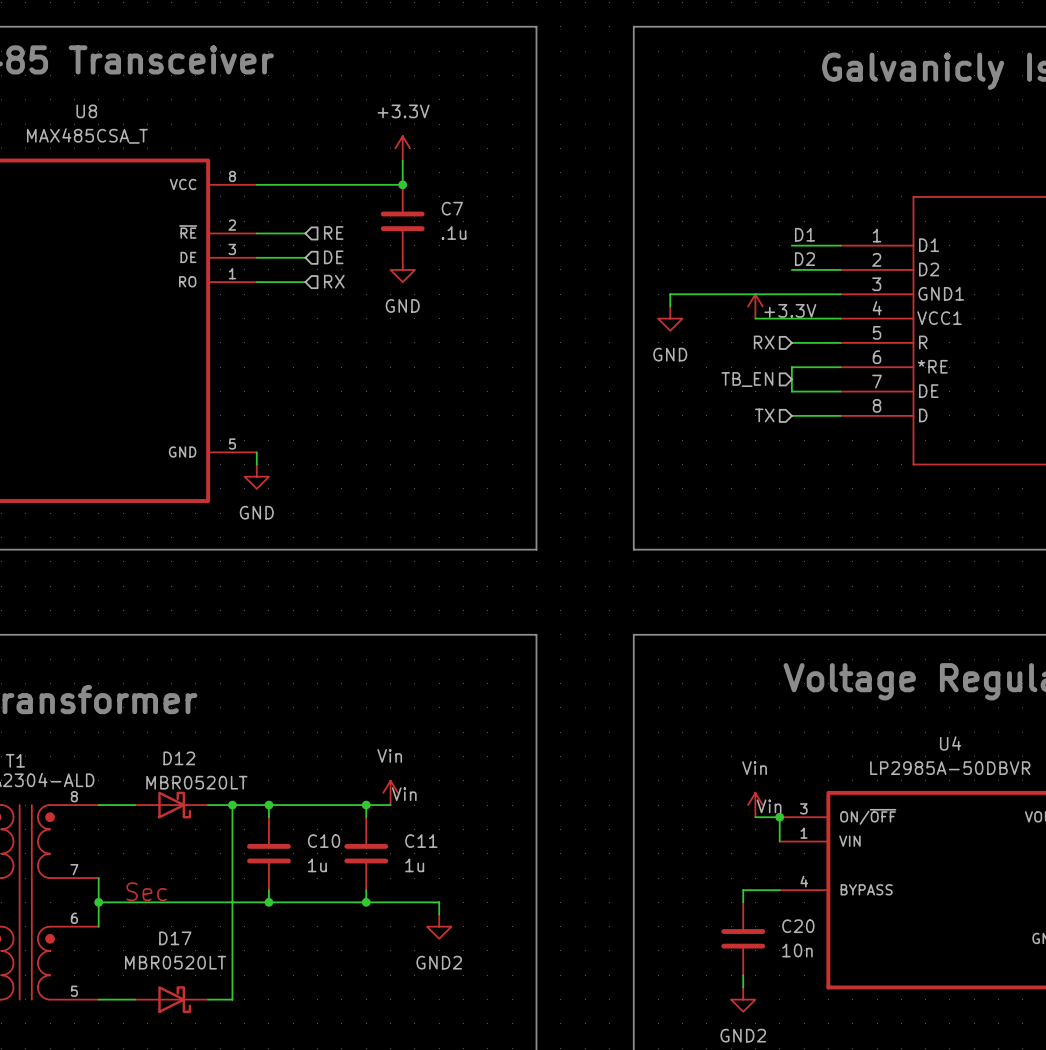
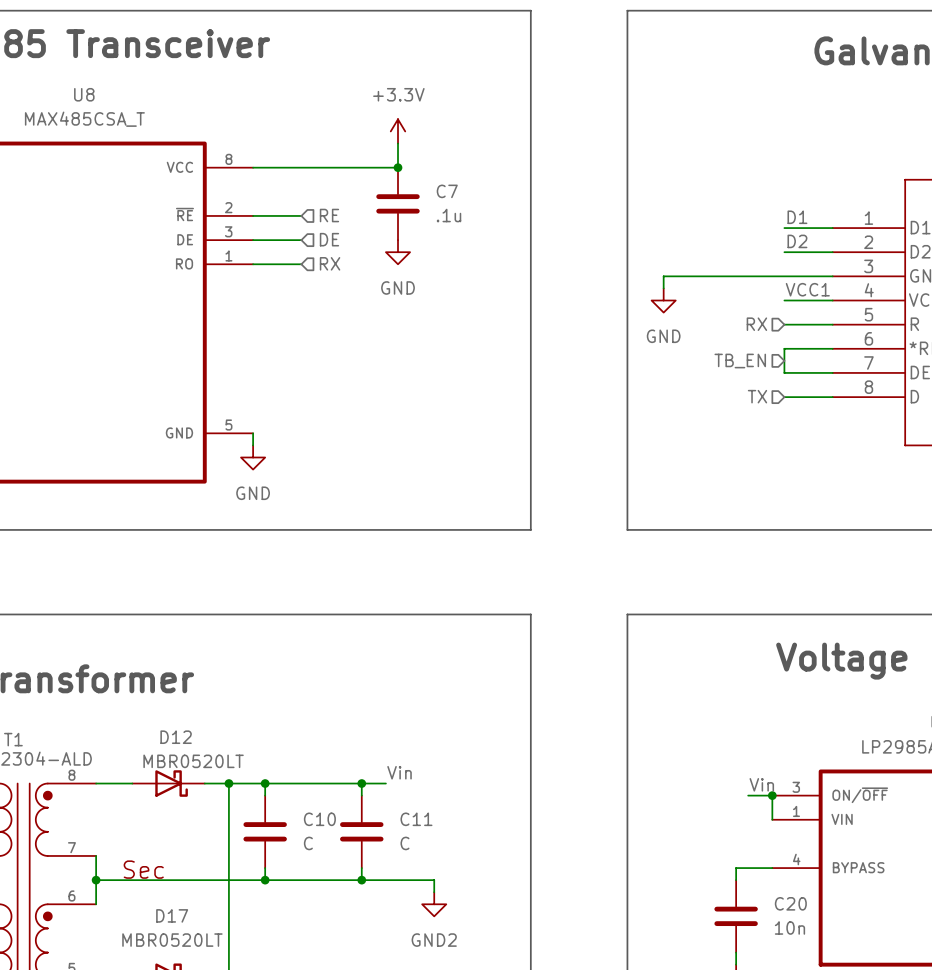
power symbol: +3.3V (755, 306) -> none
label: none -> VCC1 (807, 289)
wire: (755, 318) (791, 318) -> none
power symbol: Vin (390, 792) -> none
power symbol: Vin (755, 805) -> none
C10 value: 1u (317, 865) -> C (308, 843)
C11 value: 1u (414, 865) -> C (404, 843)

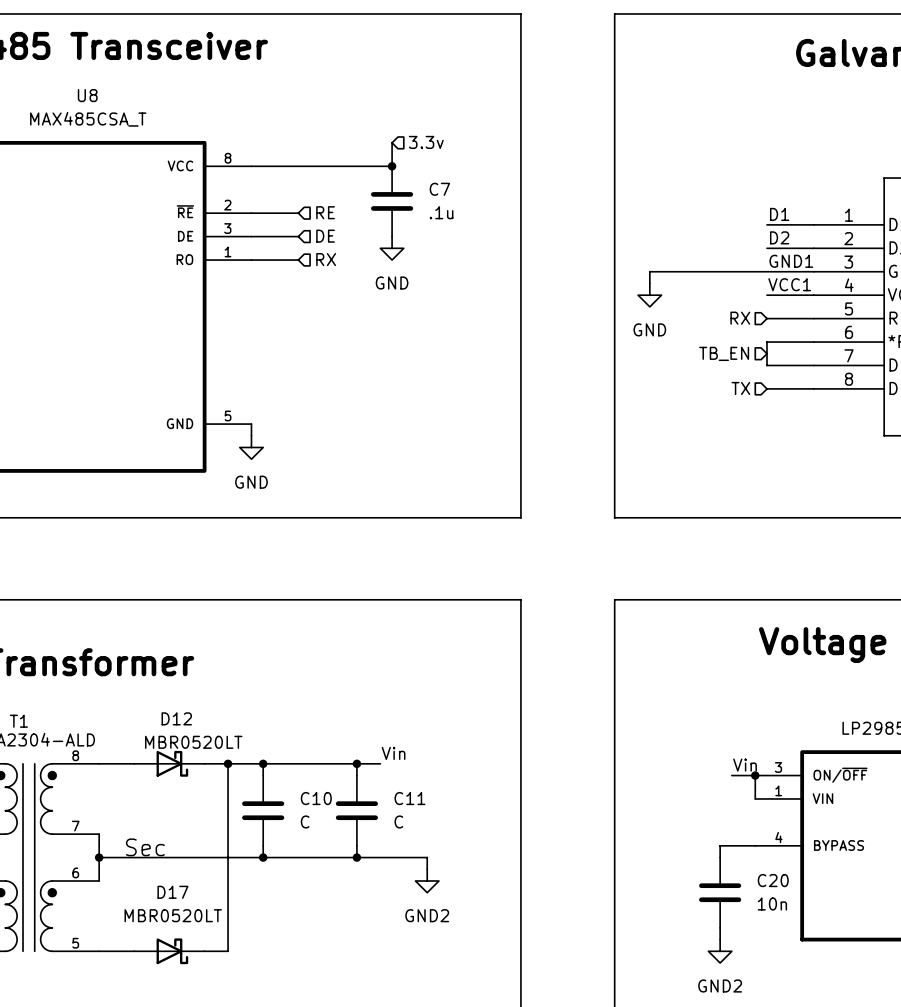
power symbol: +3.3V (398, 131) -> none
hierarchical label: none -> 3.3v (426, 142)
label: none -> GND1 (791, 261)

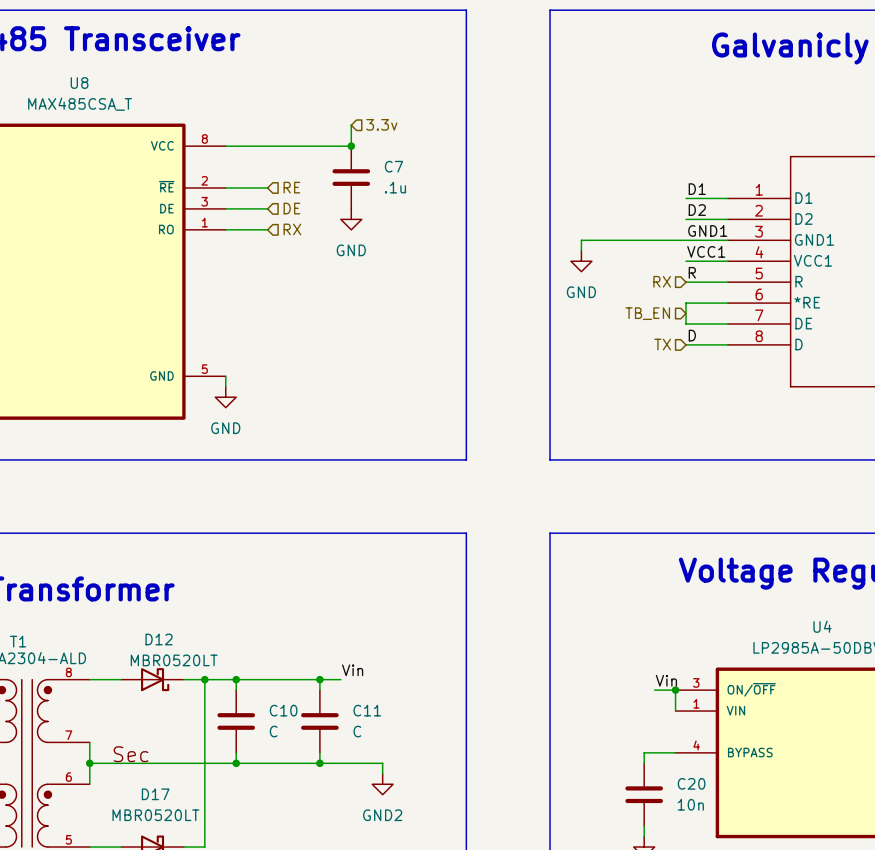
label: none -> R (692, 272)
label: none -> D (692, 335)

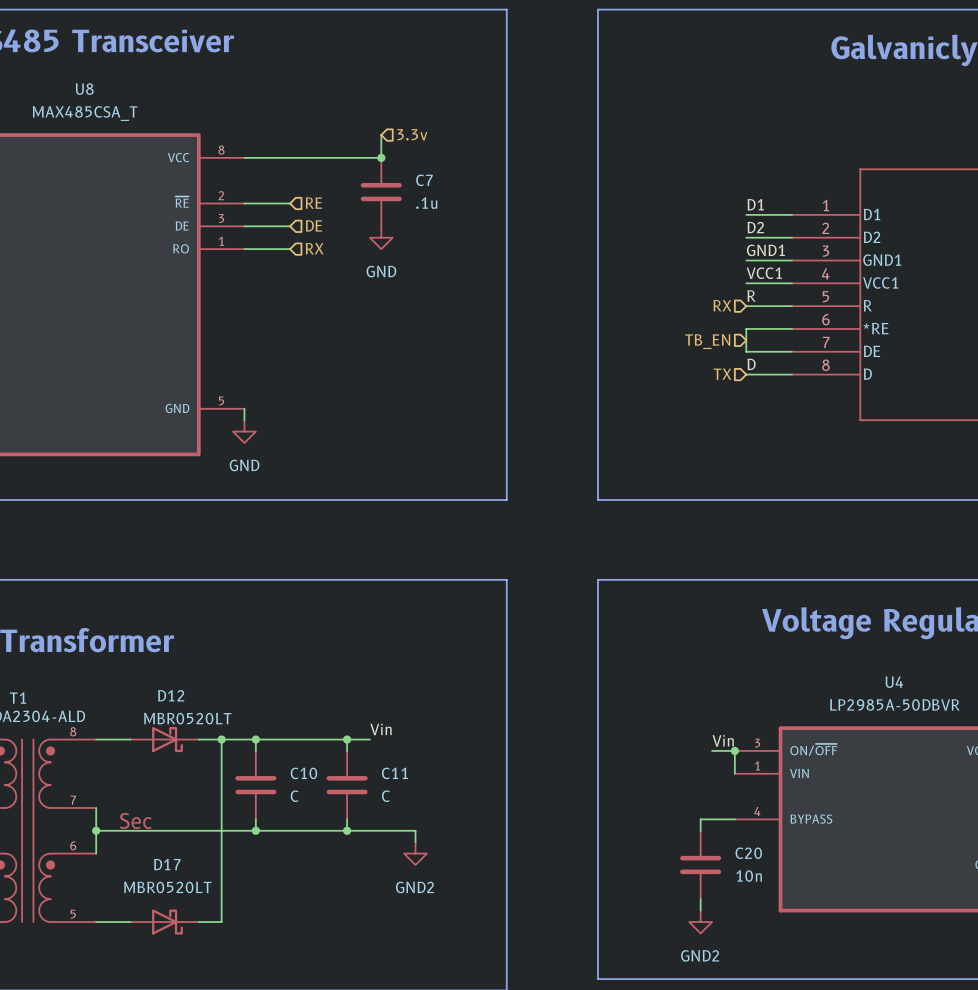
wire: (686, 240) (581, 240) (581, 250) -> none
power symbol: GND (581, 261) -> none

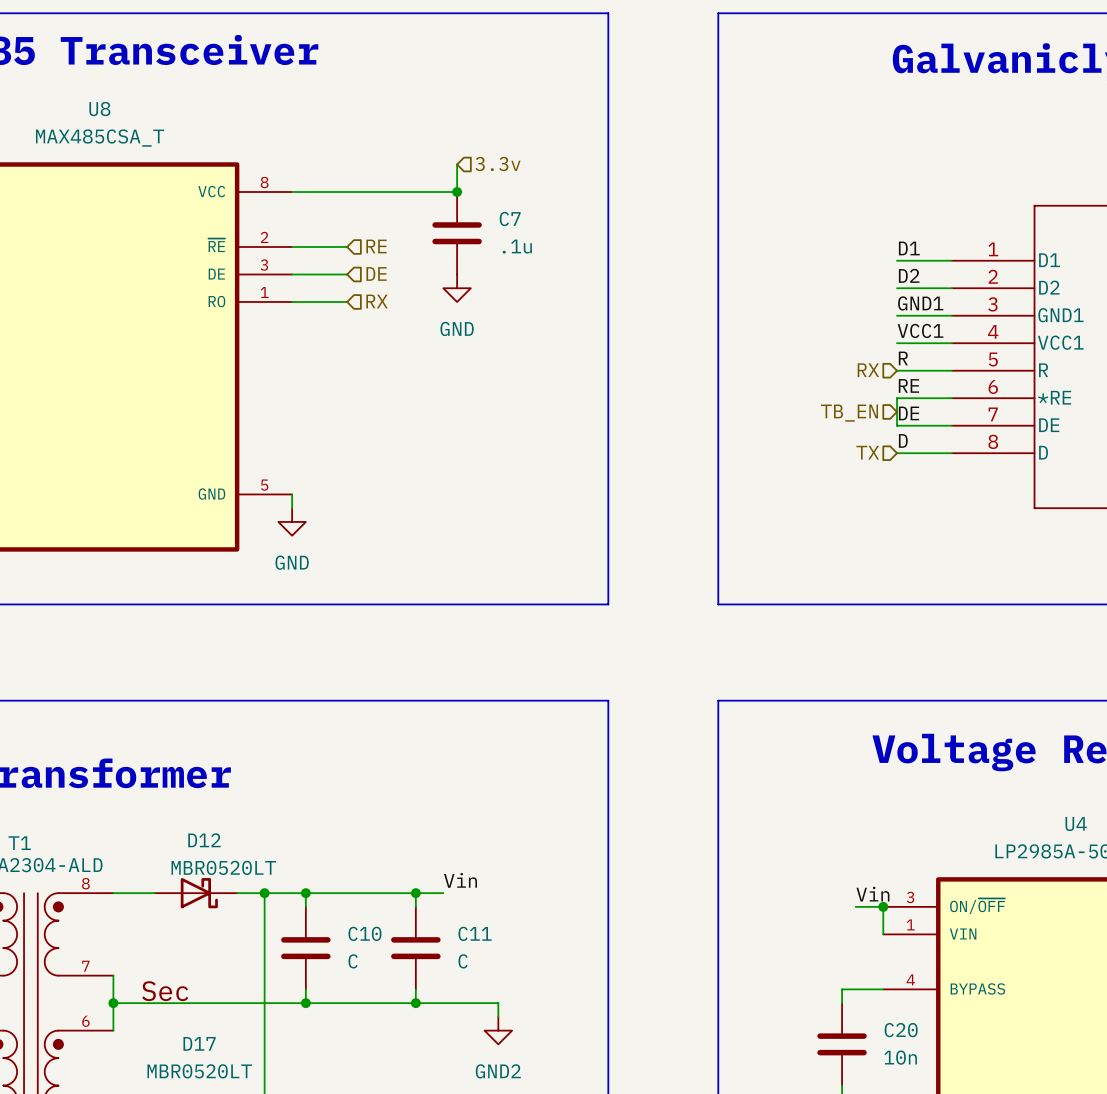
label: none -> RE (908, 385)
label: none -> DE (908, 413)

